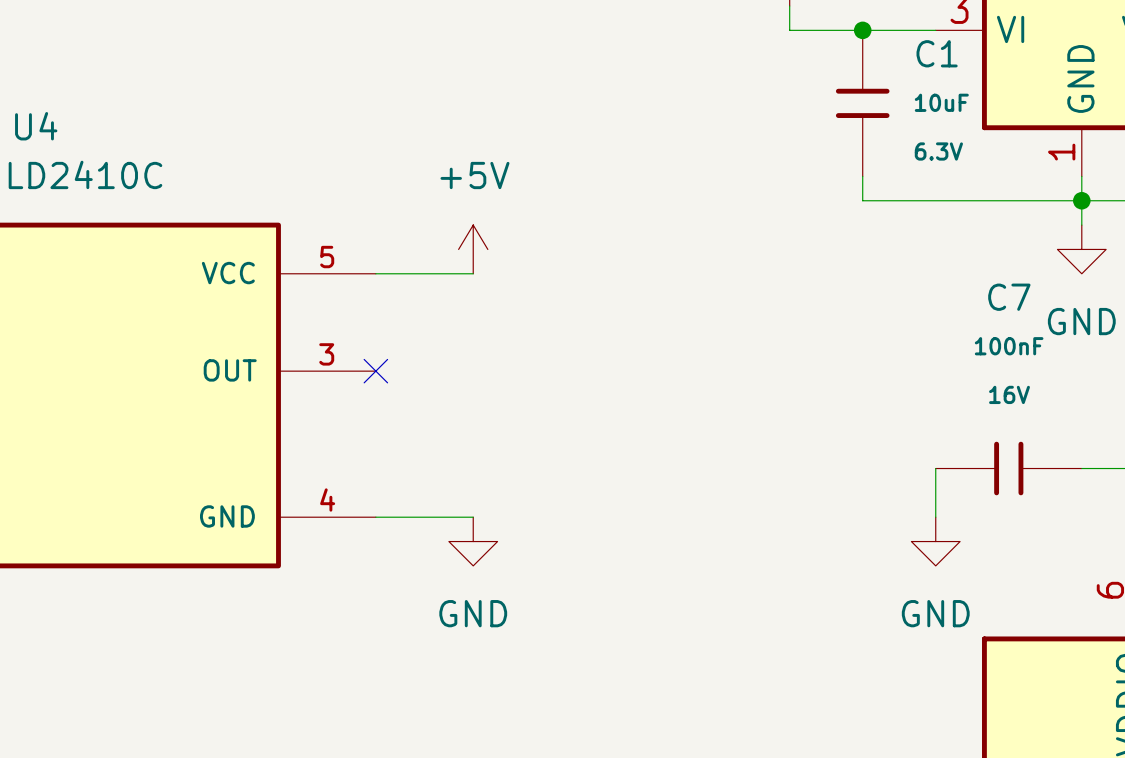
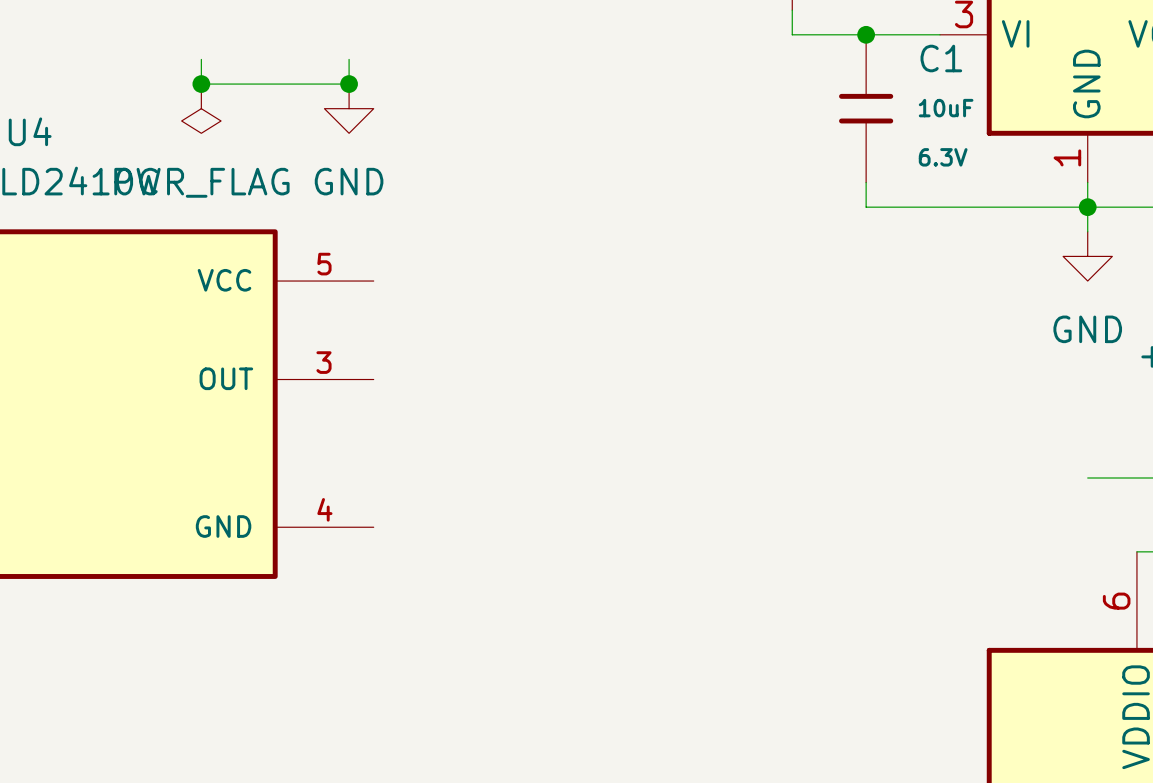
wire: none -> (201, 59) (201, 84) (349, 84) (349, 59)
junction: none -> (201, 84)
junction: none -> (349, 84)
power symbol: none -> PWR_FLAG (201, 108)
power symbol: none -> GND (349, 108)
power symbol: +5V (473, 249) -> none
wire: (375, 273) (473, 273) -> none
no-connect mark: (375, 371) -> none
wire: (935, 468) (935, 517) -> none
C7: 100nF (1008, 468) -> none
wire: (375, 517) (473, 517) -> none
power symbol: GND (473, 541) -> none
power symbol: GND (935, 541) -> none

